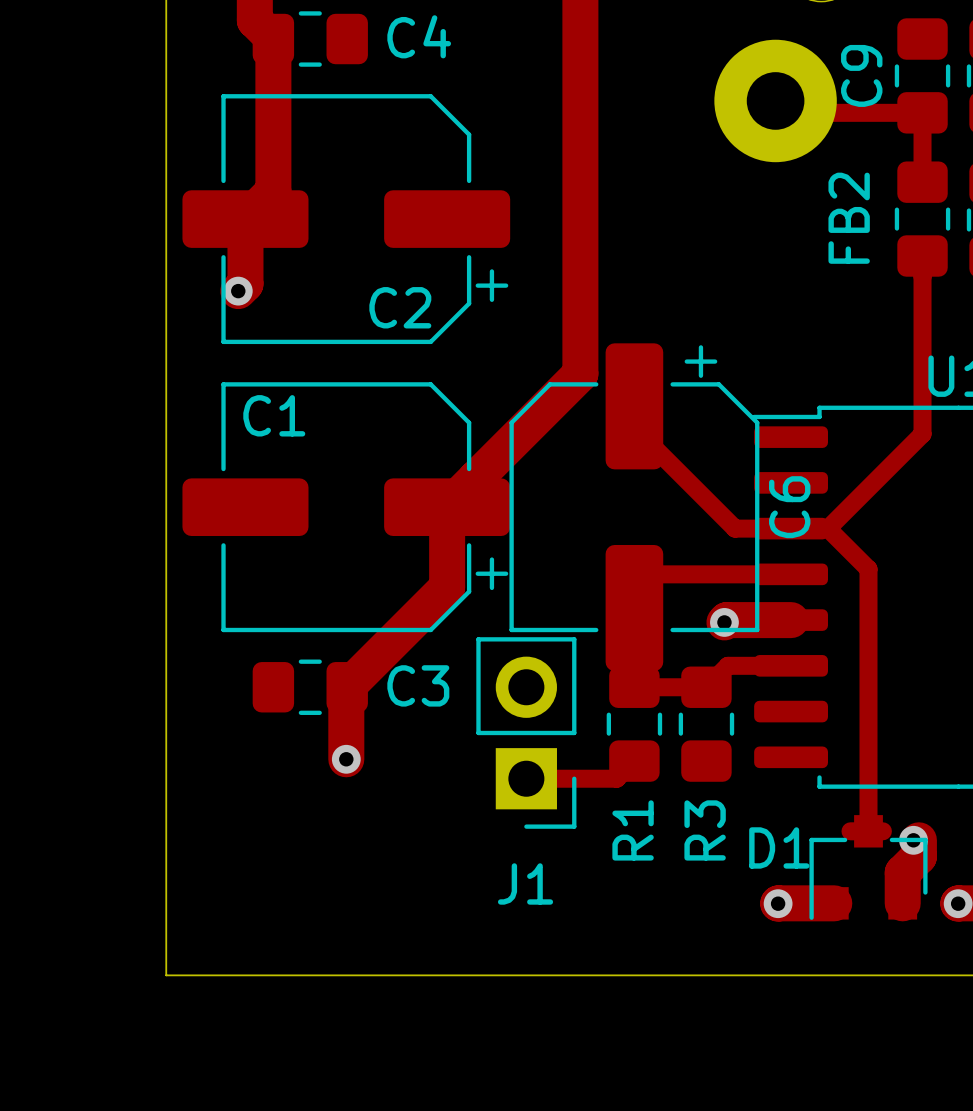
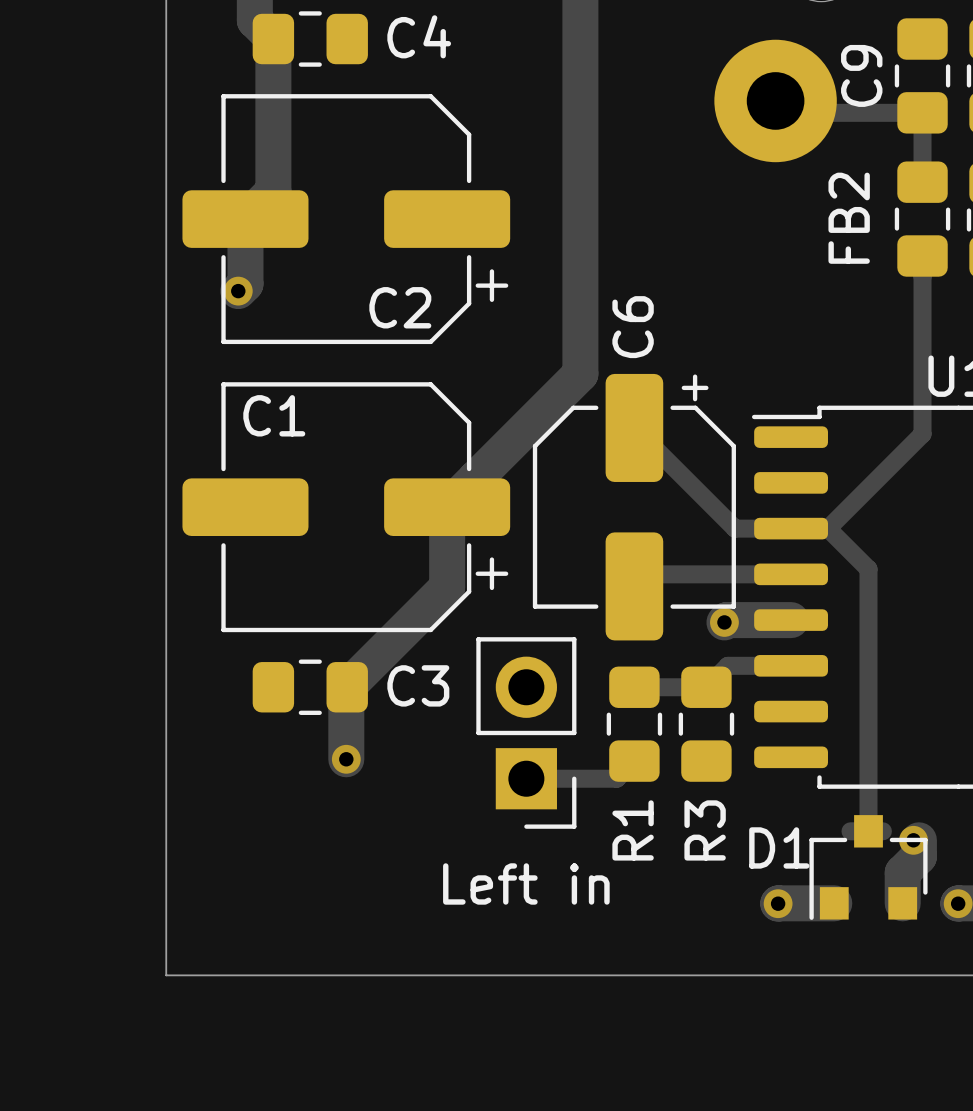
C6 footprint: [509, 343, 760, 672] -> [532, 373, 736, 641]
C6 name position: C6 (789, 507) -> C6 (633, 327)
J1 name: J1 (525, 883) -> Left in (526, 883)

